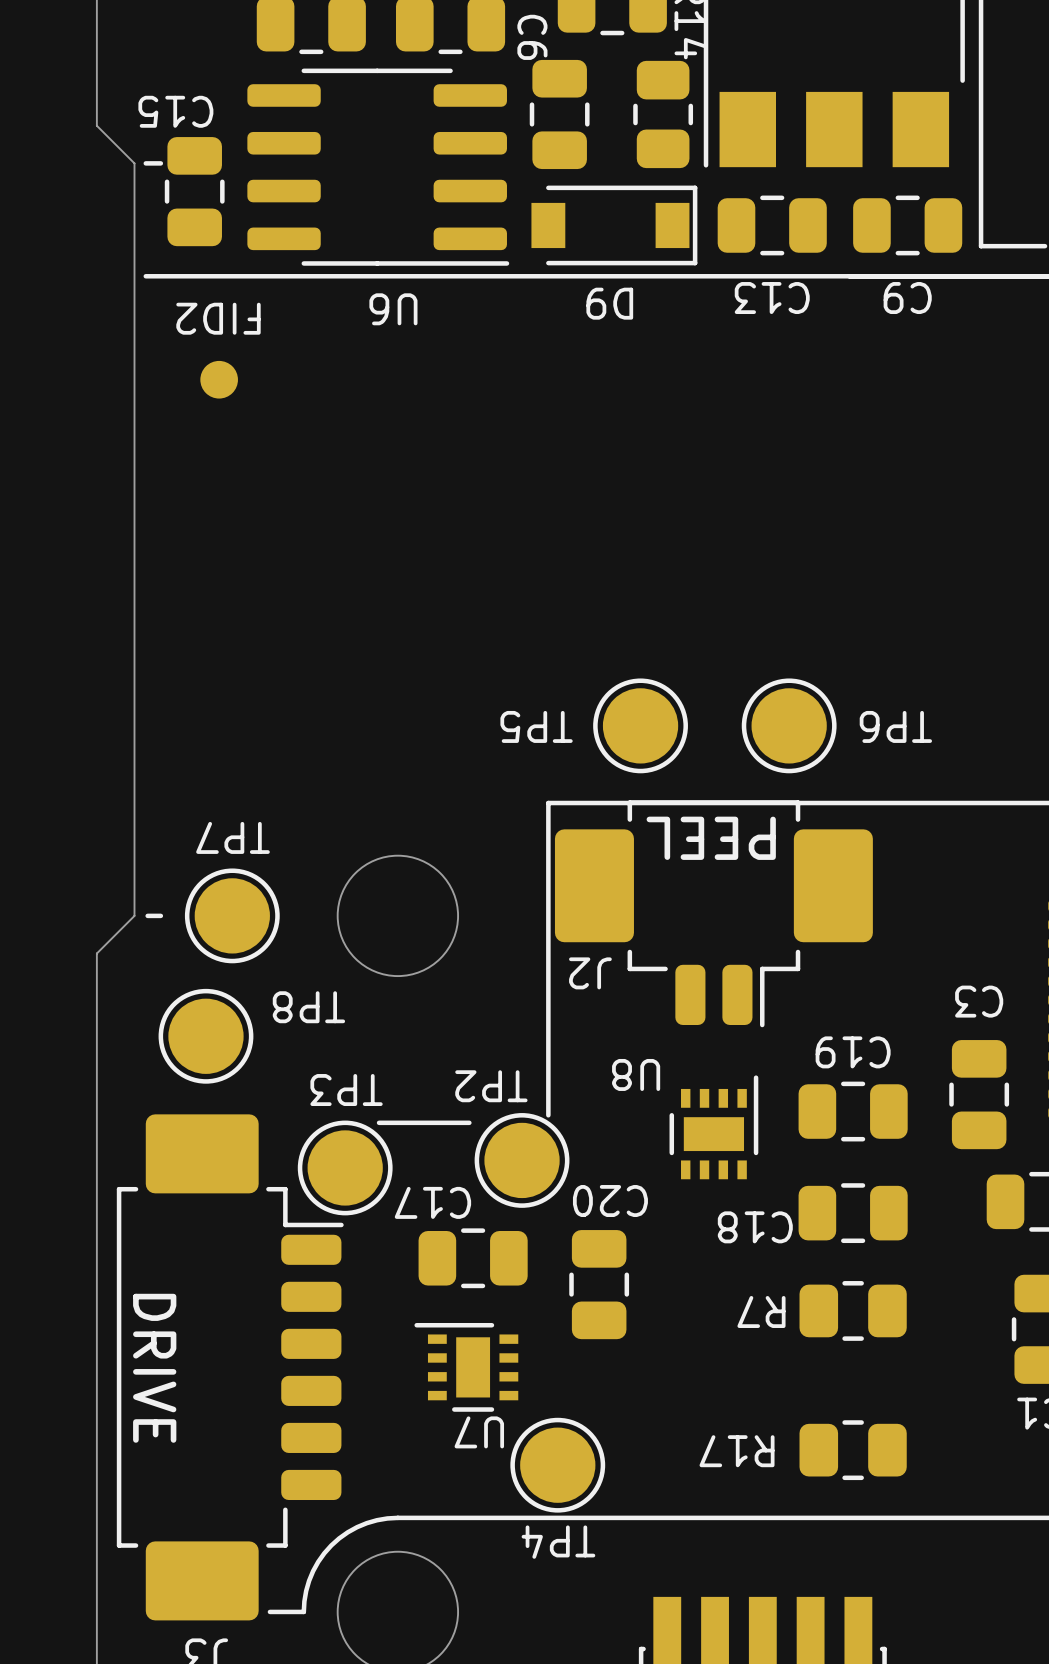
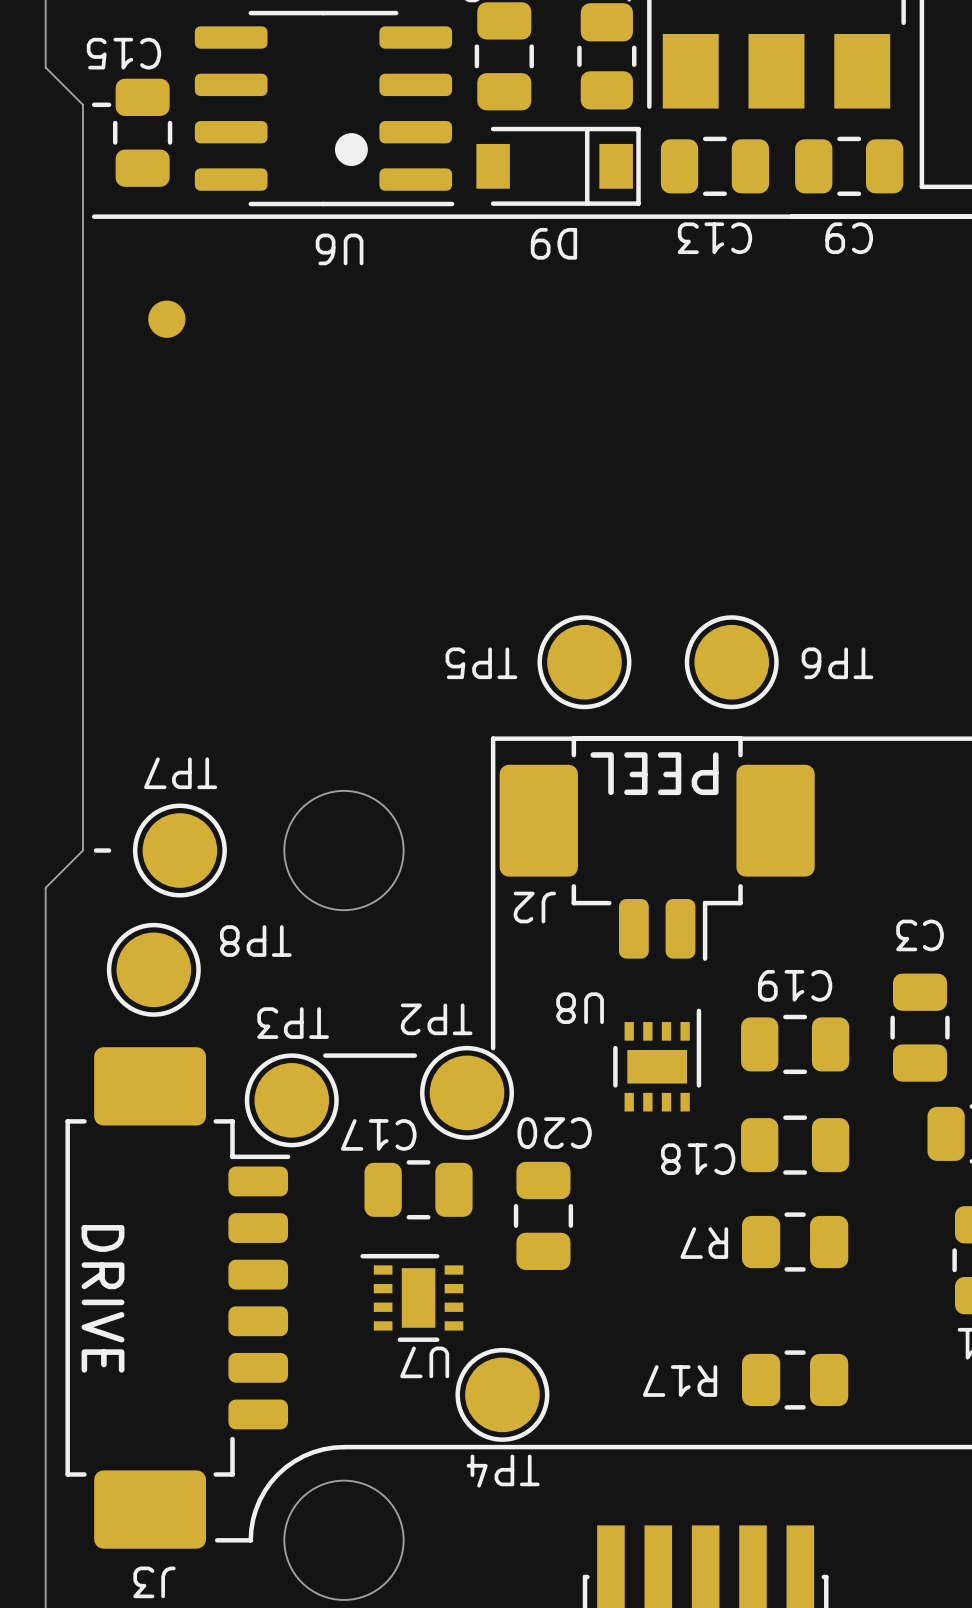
line: none -> (587, 129) (587, 203)
drawing: none -> [334, 133, 368, 167]
FID2 name: FID2 (218, 318) -> none

